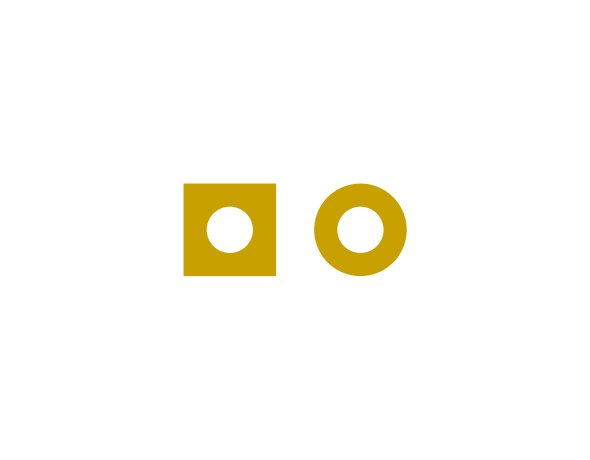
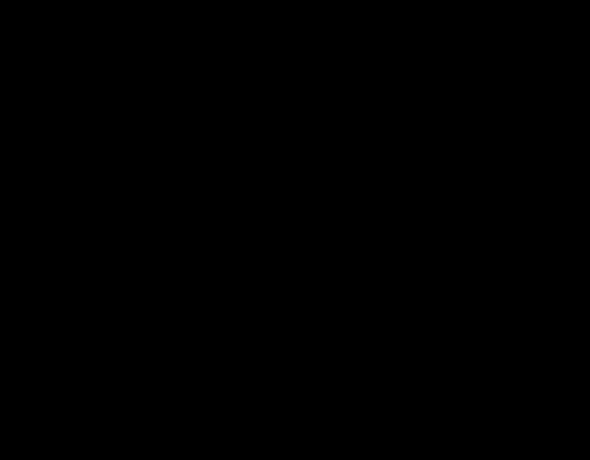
part: (295, 229) -> none

